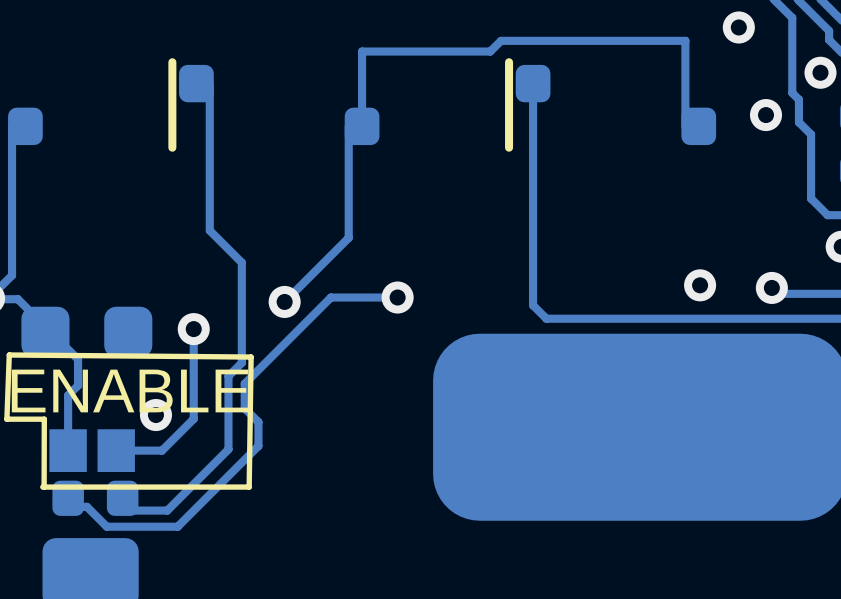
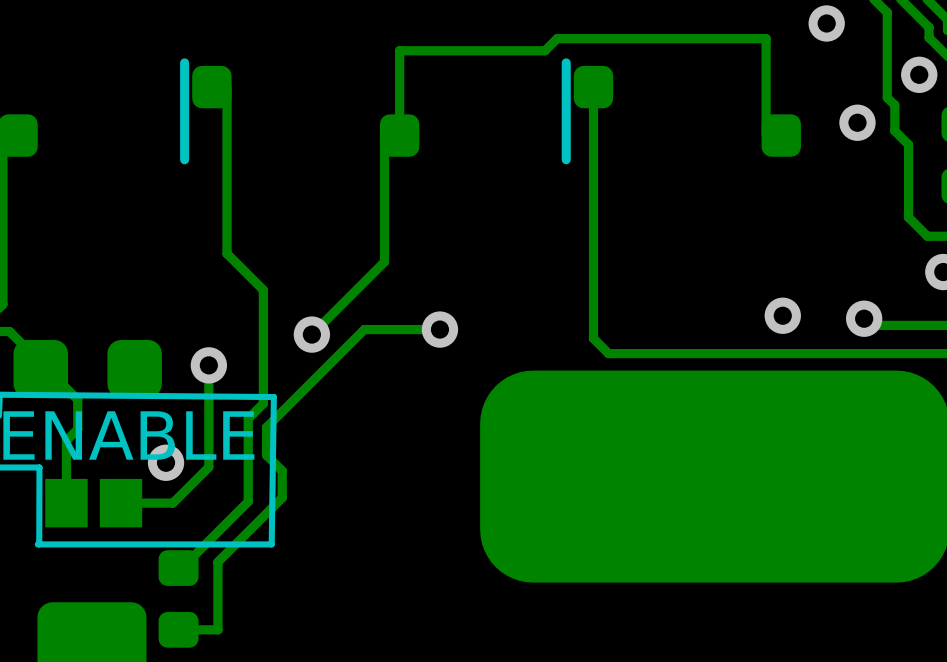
part rotation: 0° (95, 498) -> 90° clockwise (178, 598)
part position: (95, 498) -> (178, 598)
track: (201, 502) (177, 526) (106, 526) (86, 506) (69, 506) -> (217, 562) (217, 629) (178, 629)
track: (169, 507) (167, 510) (124, 510) -> none

